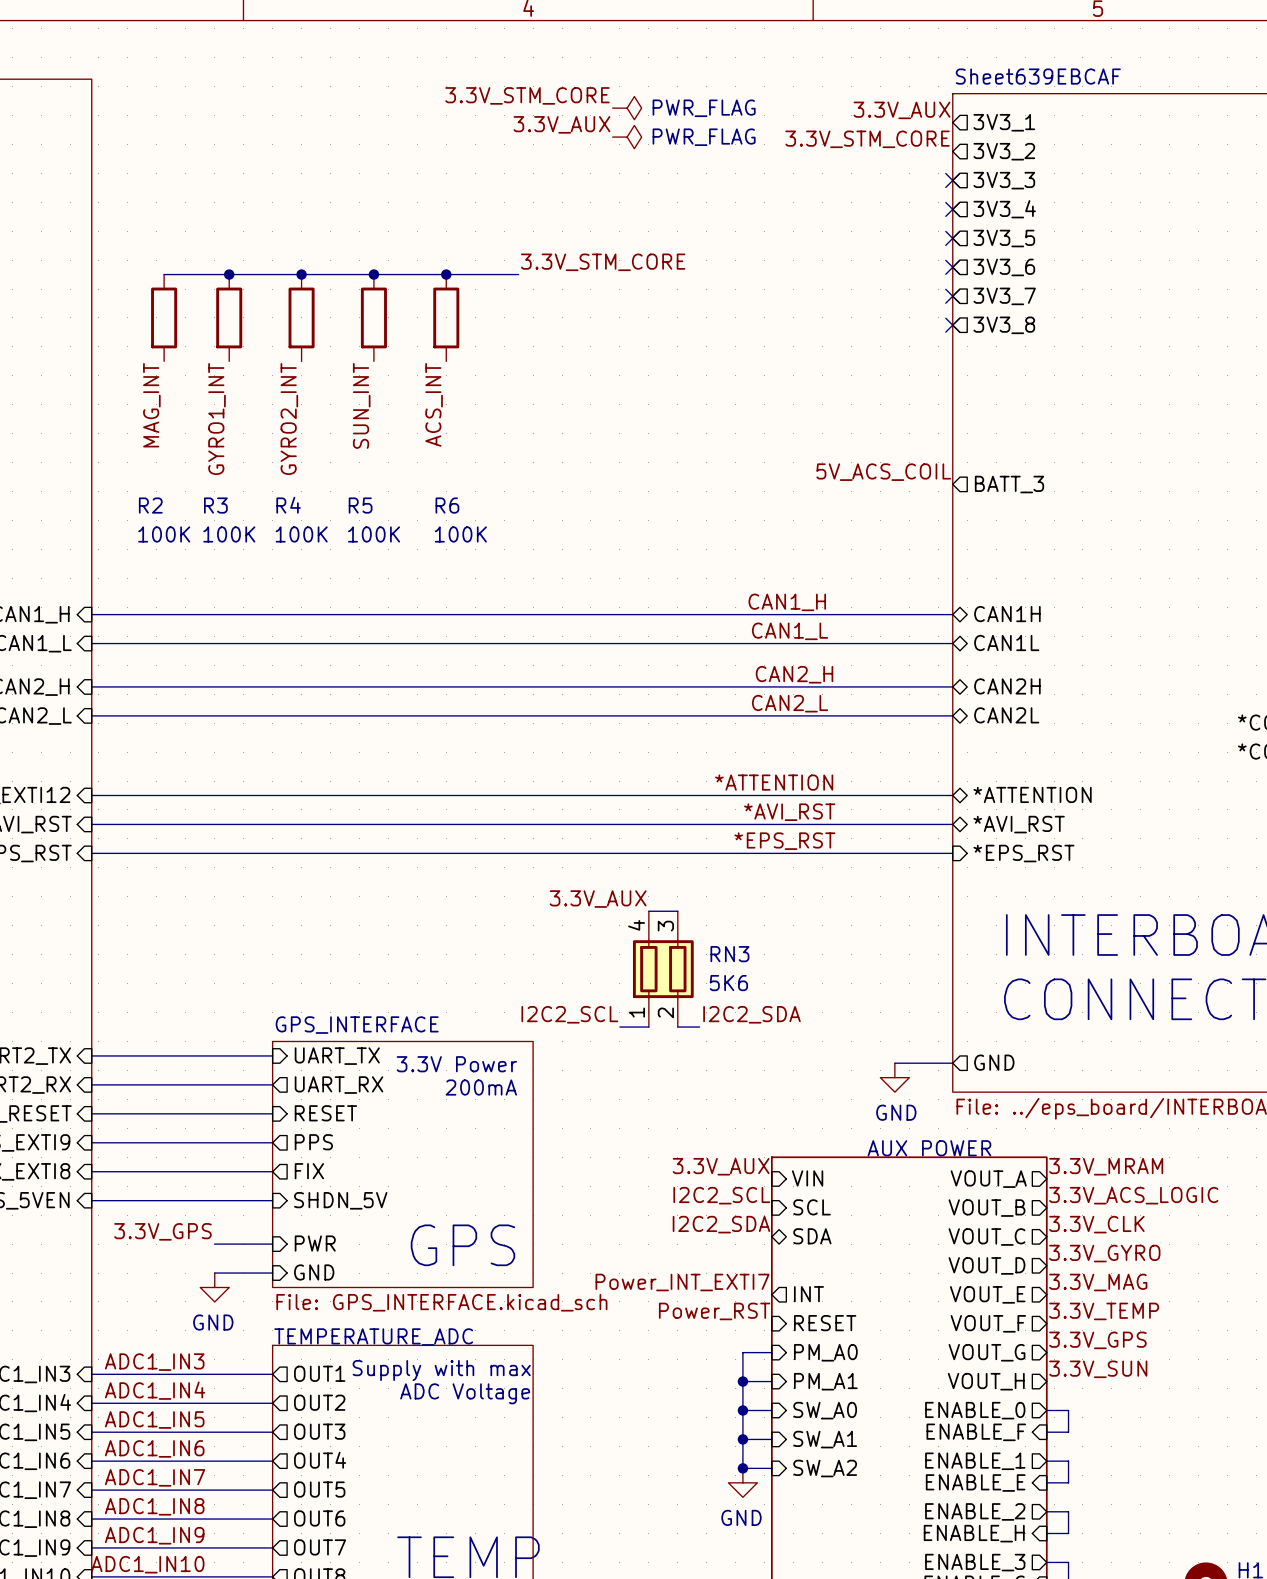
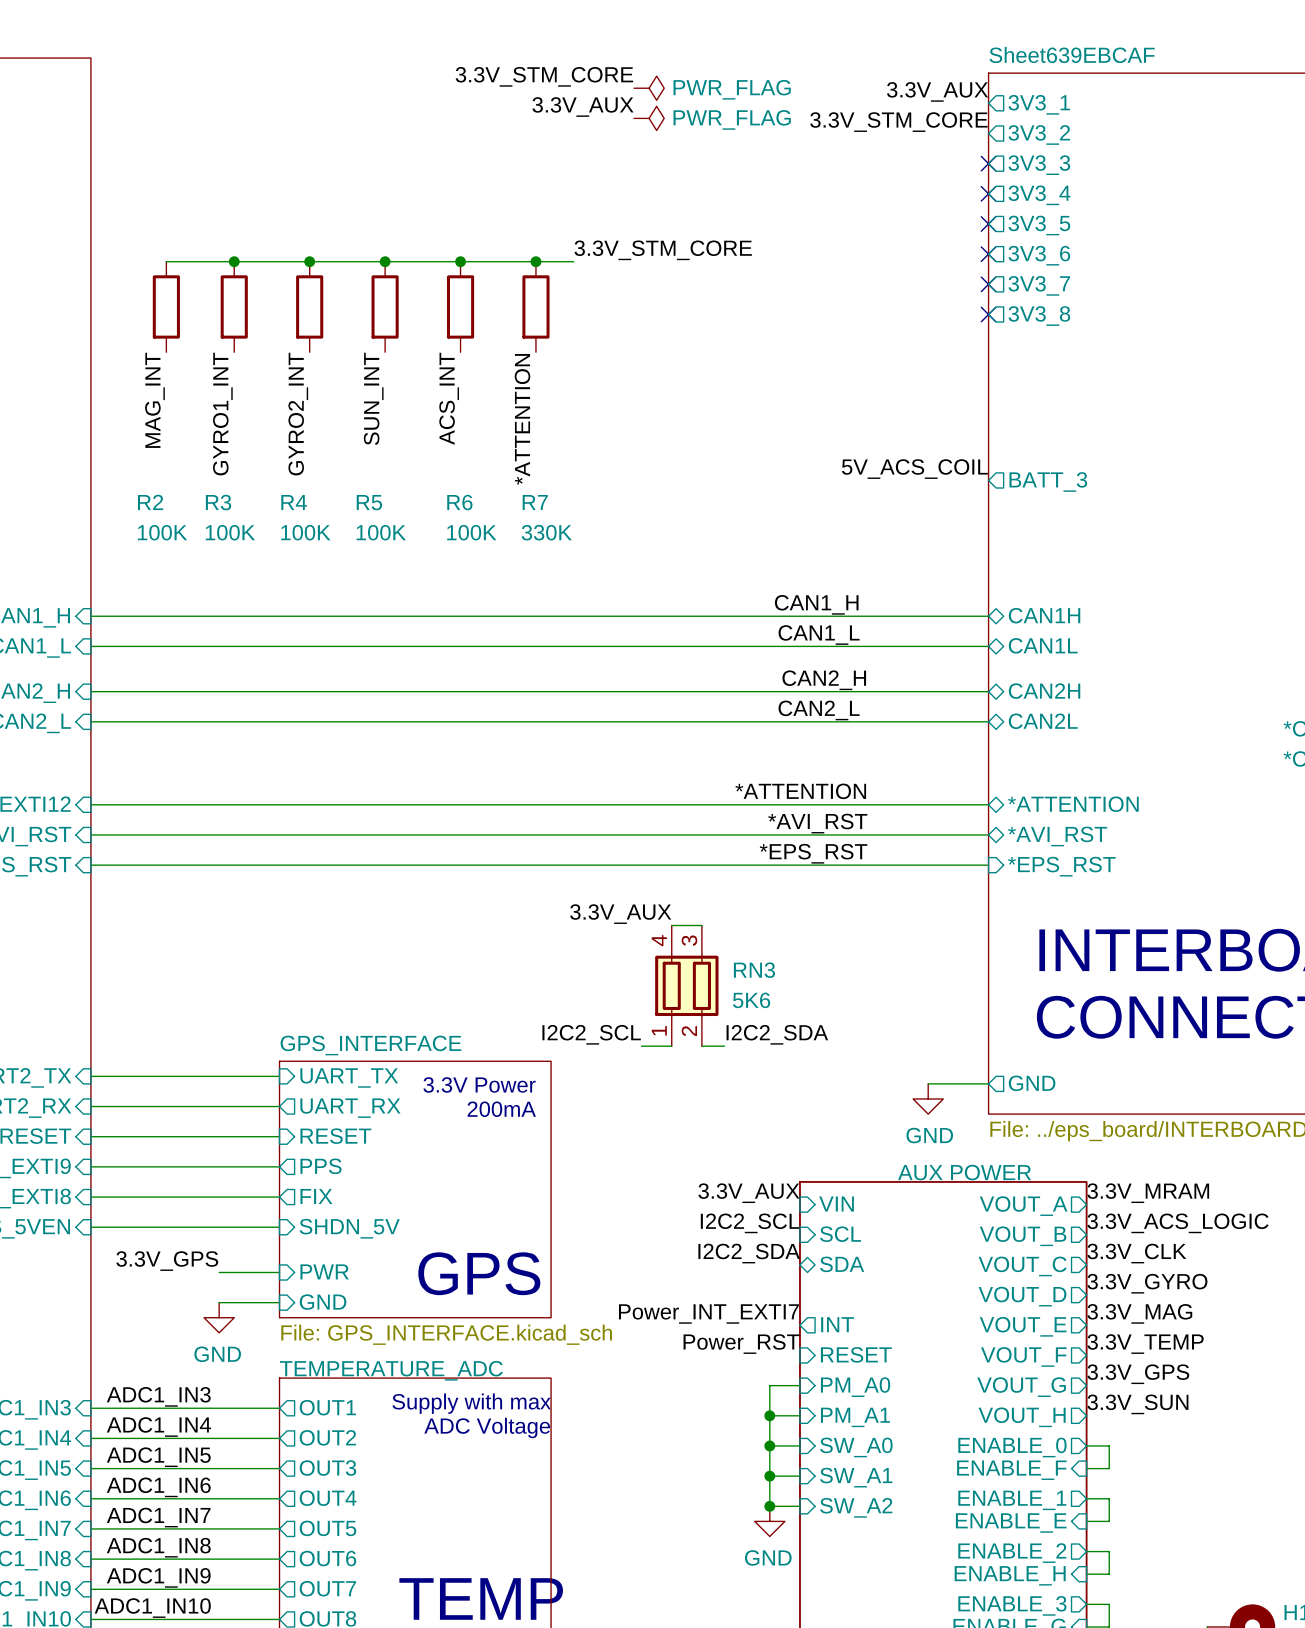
label position: 3.3V_STM_CORE (603, 262) -> 3.3V_STM_CORE (663, 250)
wire: none -> (535, 261) (573, 261)
junction: none -> (535, 261)
R7: none -> 330K (535, 306)
label: none -> *ATTENTION (522, 419)

